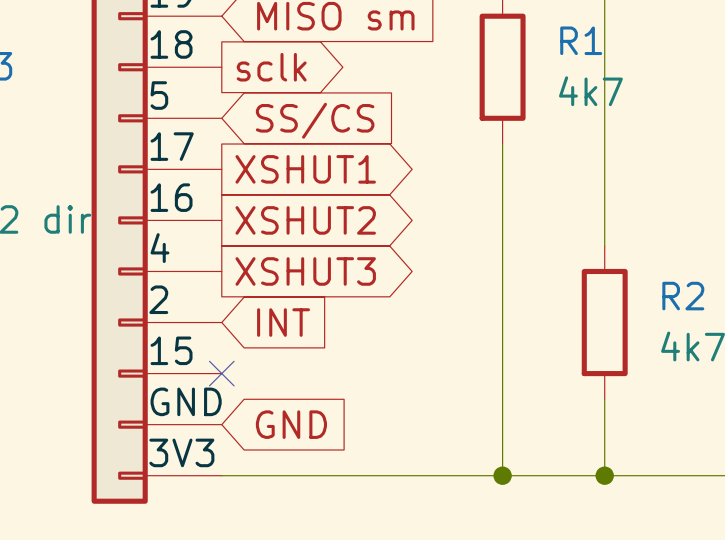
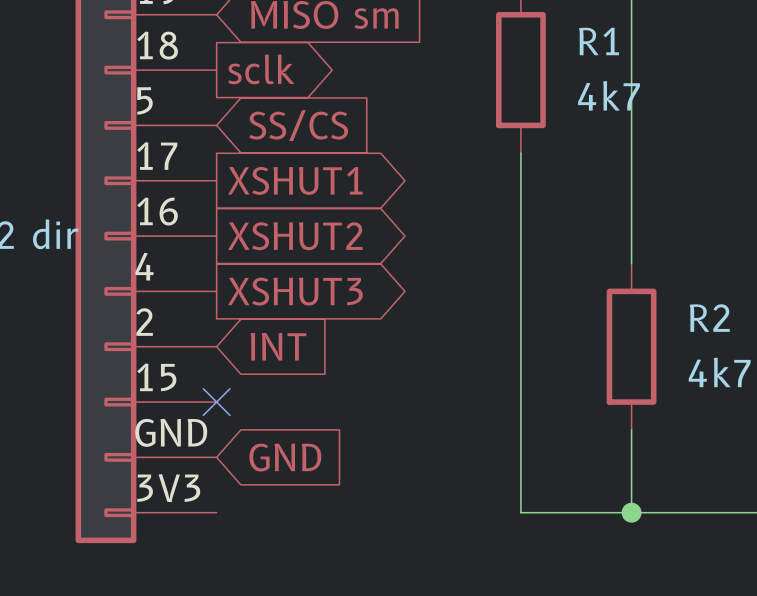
wire: (221, 475) (502, 475) -> none
junction: (502, 475) -> none

